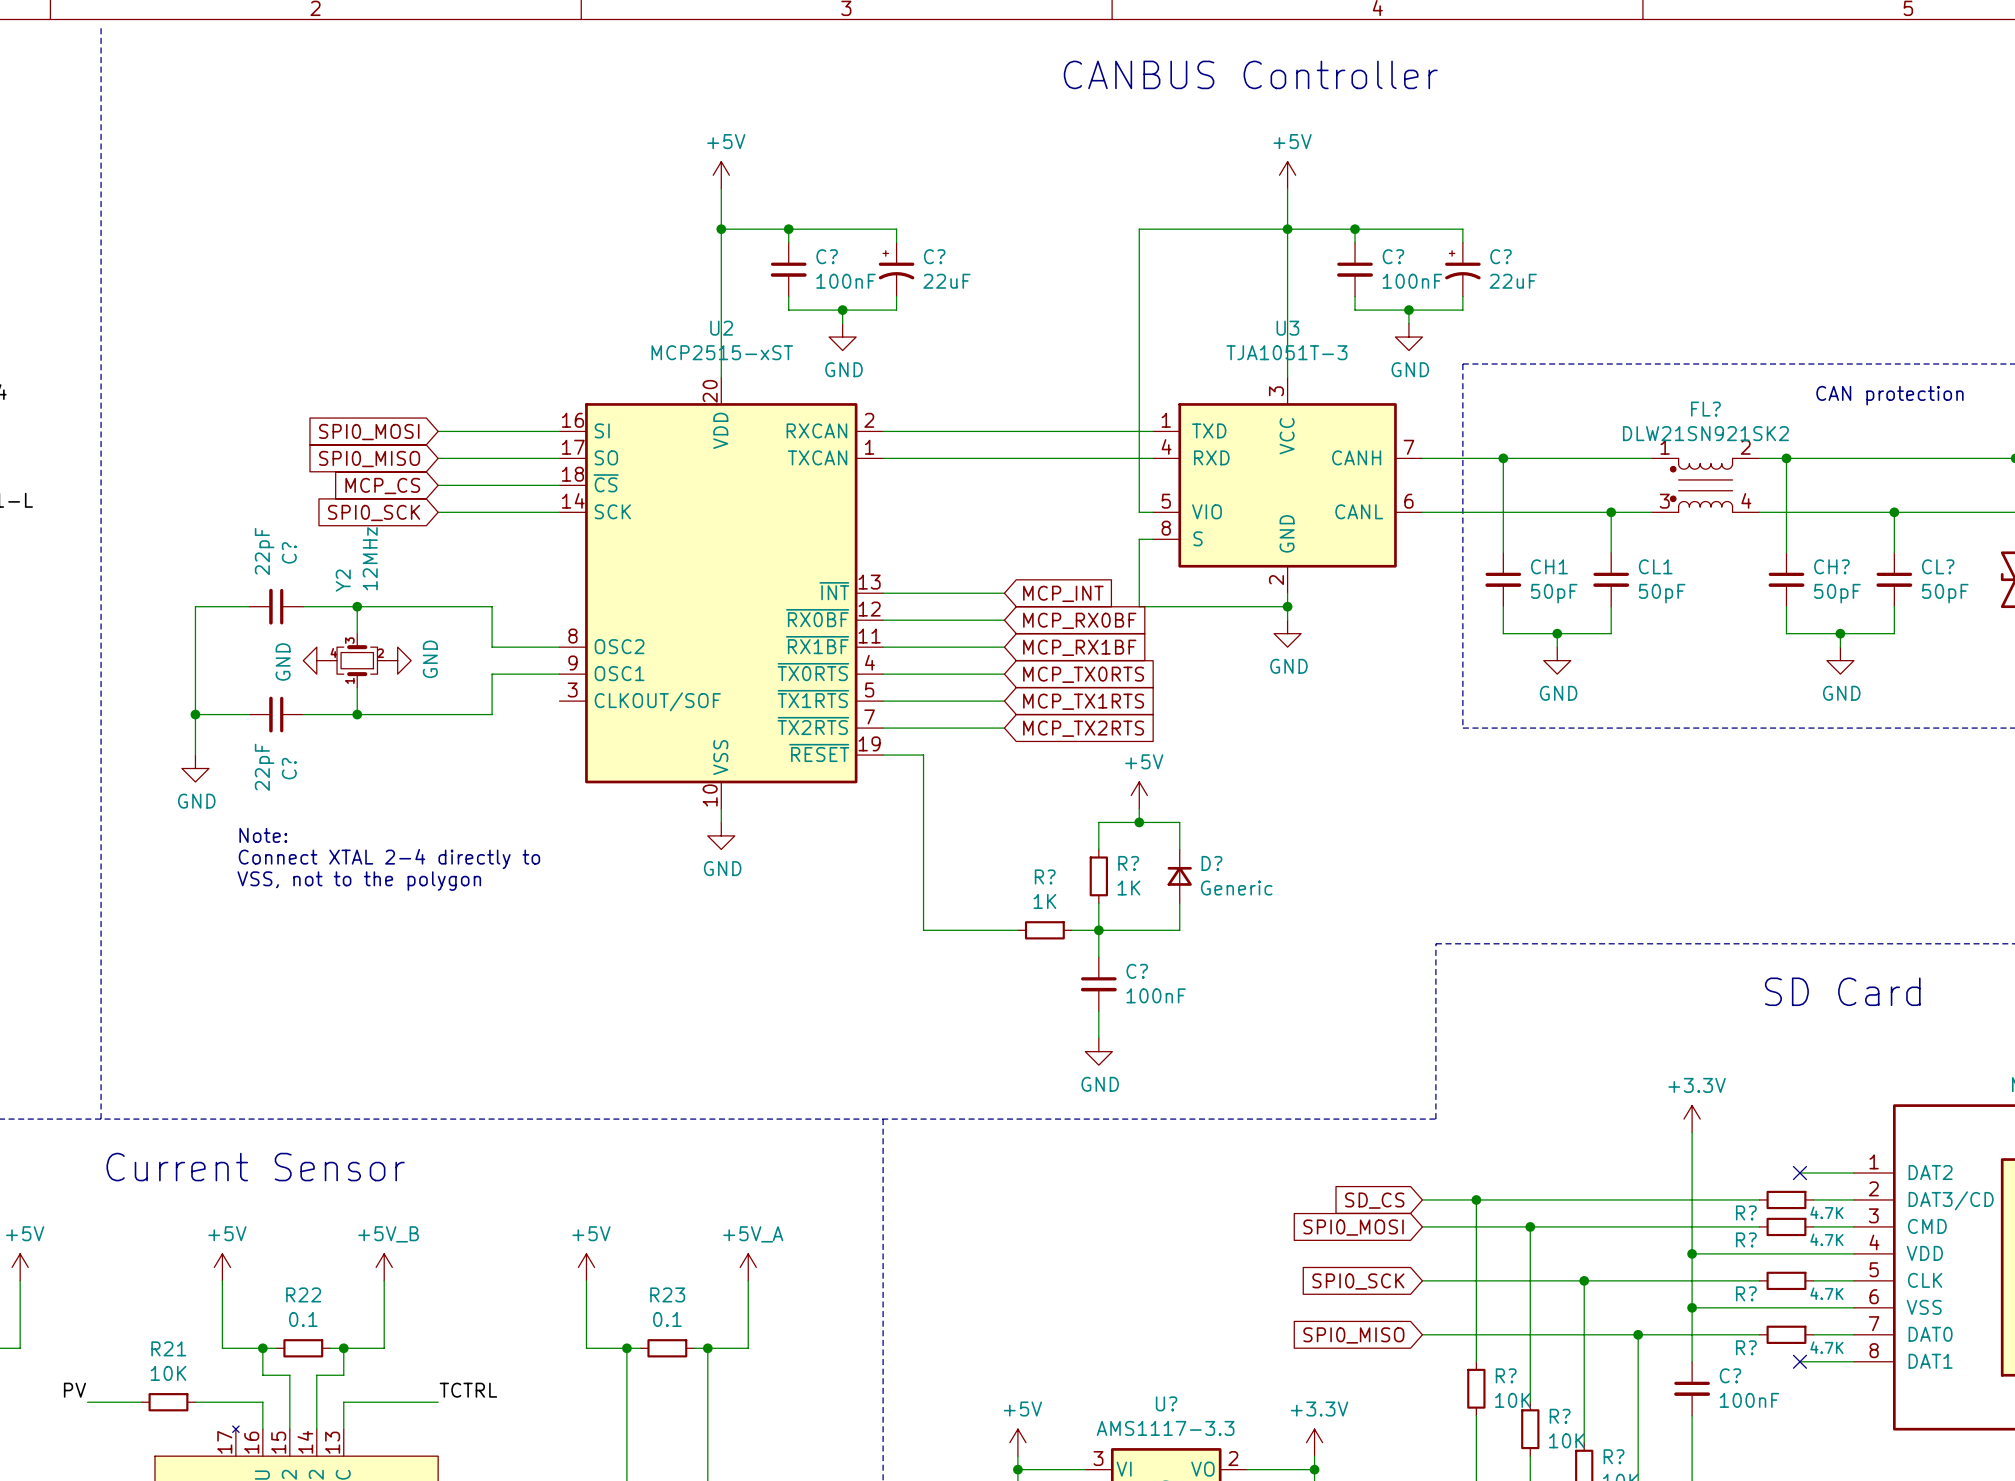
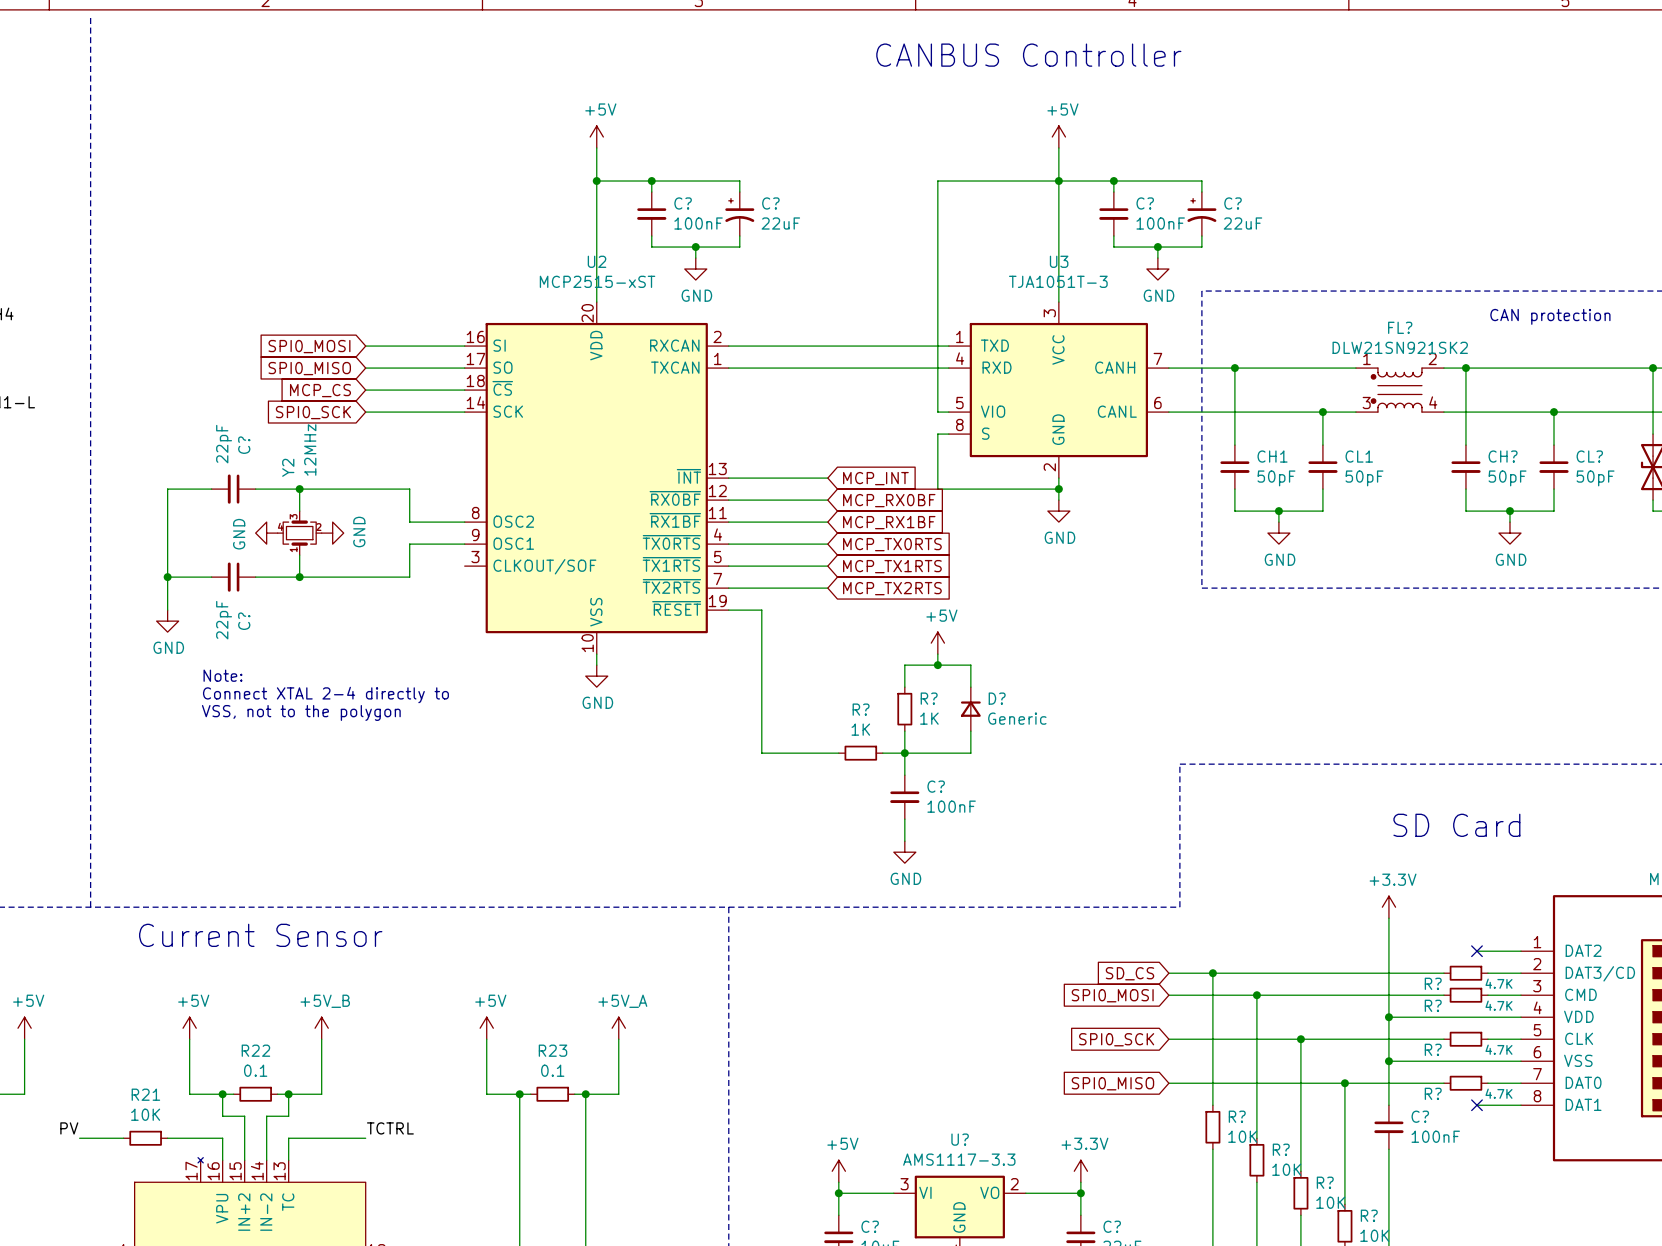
text position: SD Card (1842, 991) -> SD Card (1456, 825)
text position: Current Sensor (255, 1167) -> Current Sensor (260, 935)

